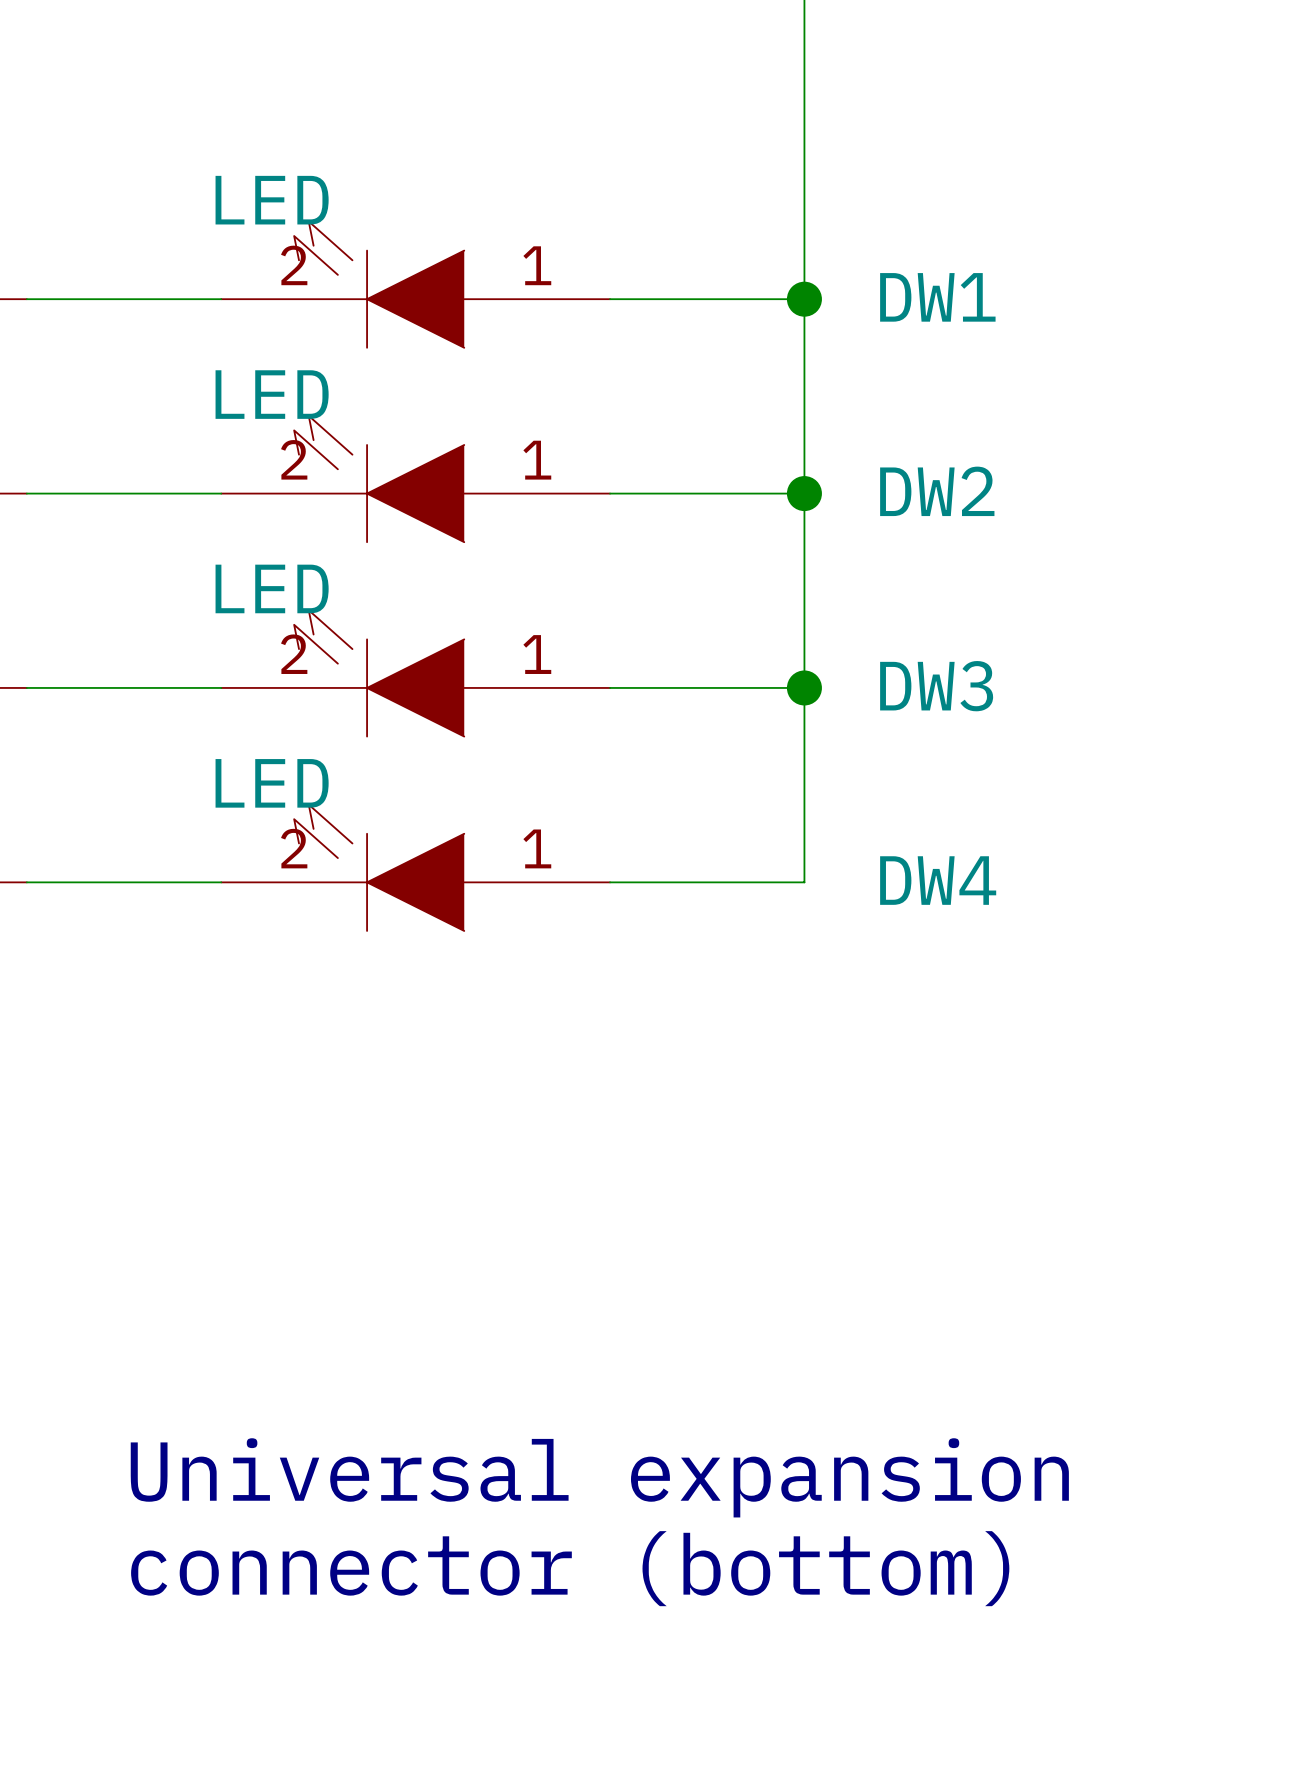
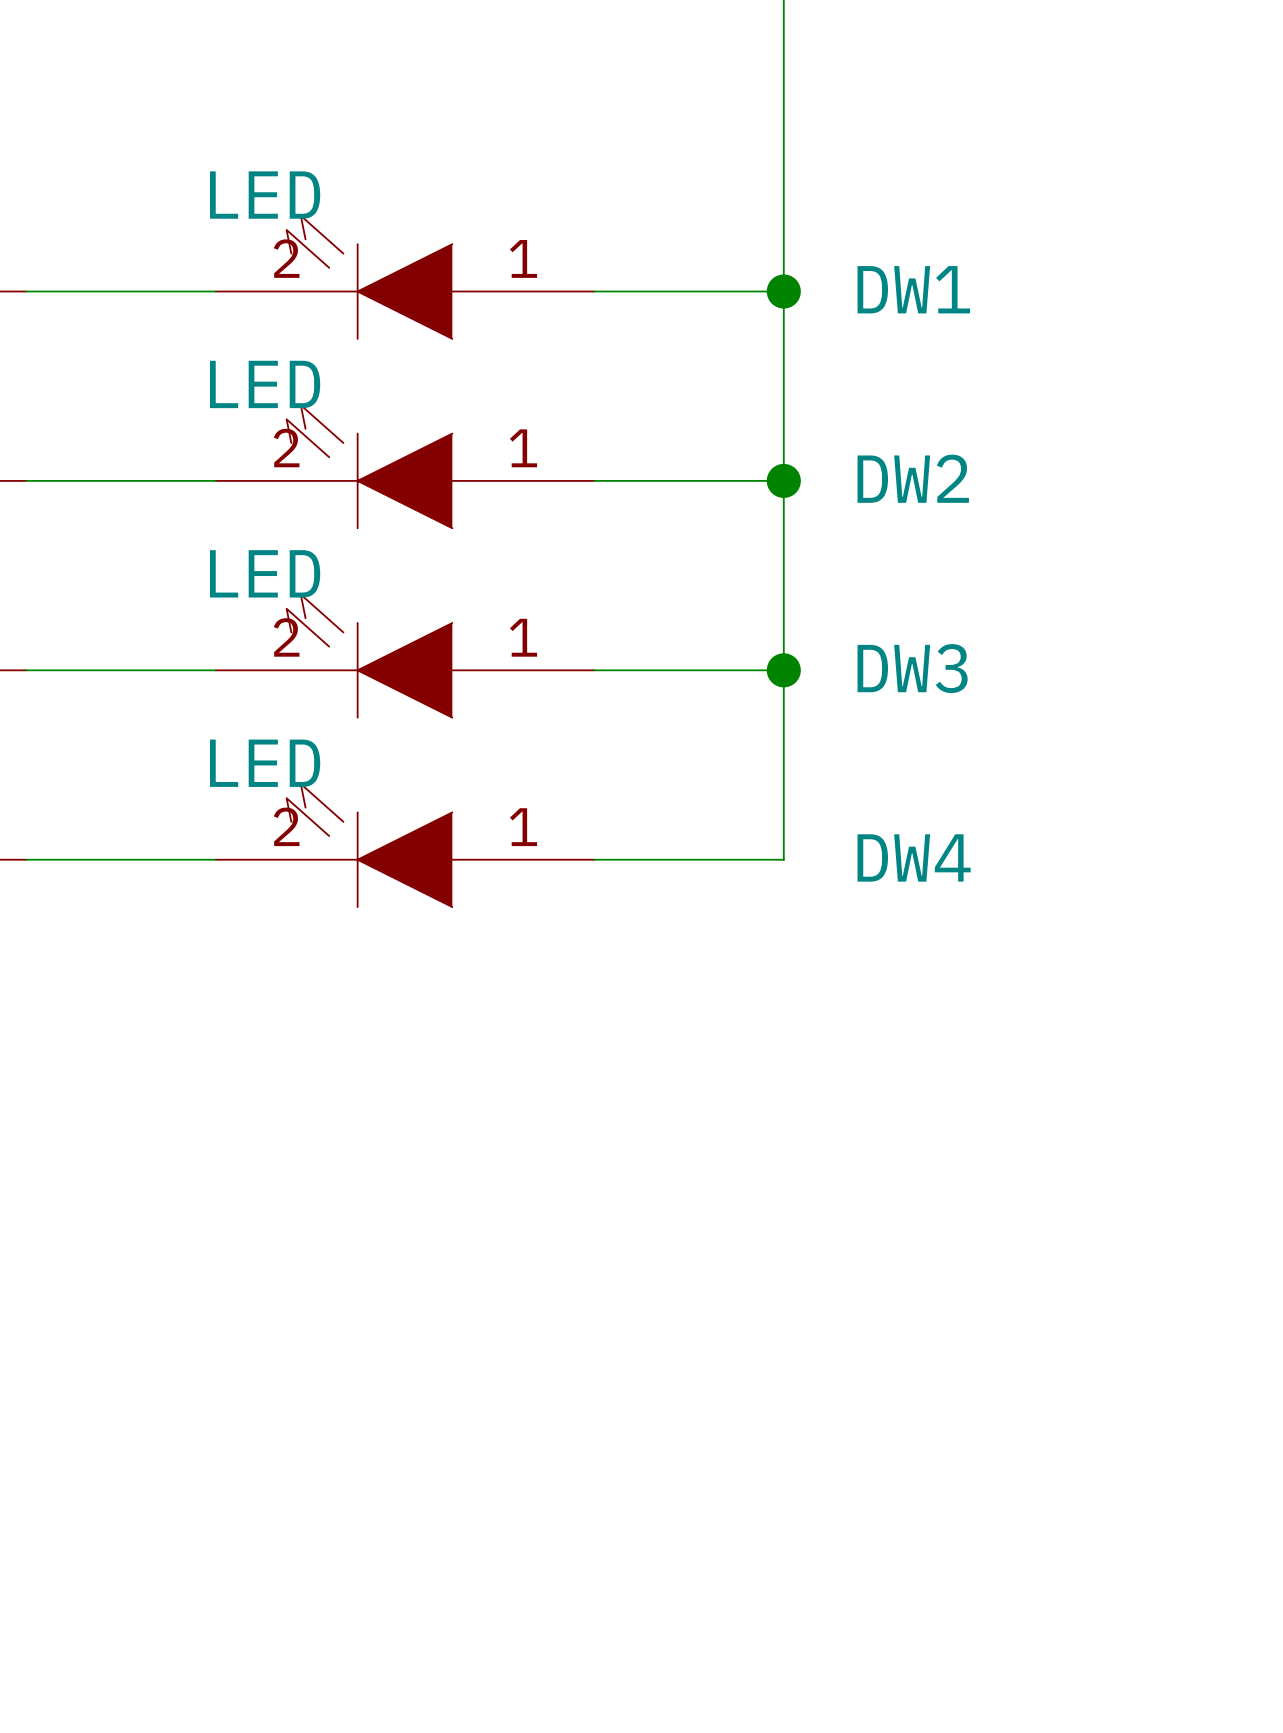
text: Universal expansion (599, 1477) -> none
text: connector (bottom) (570, 1568) -> none

